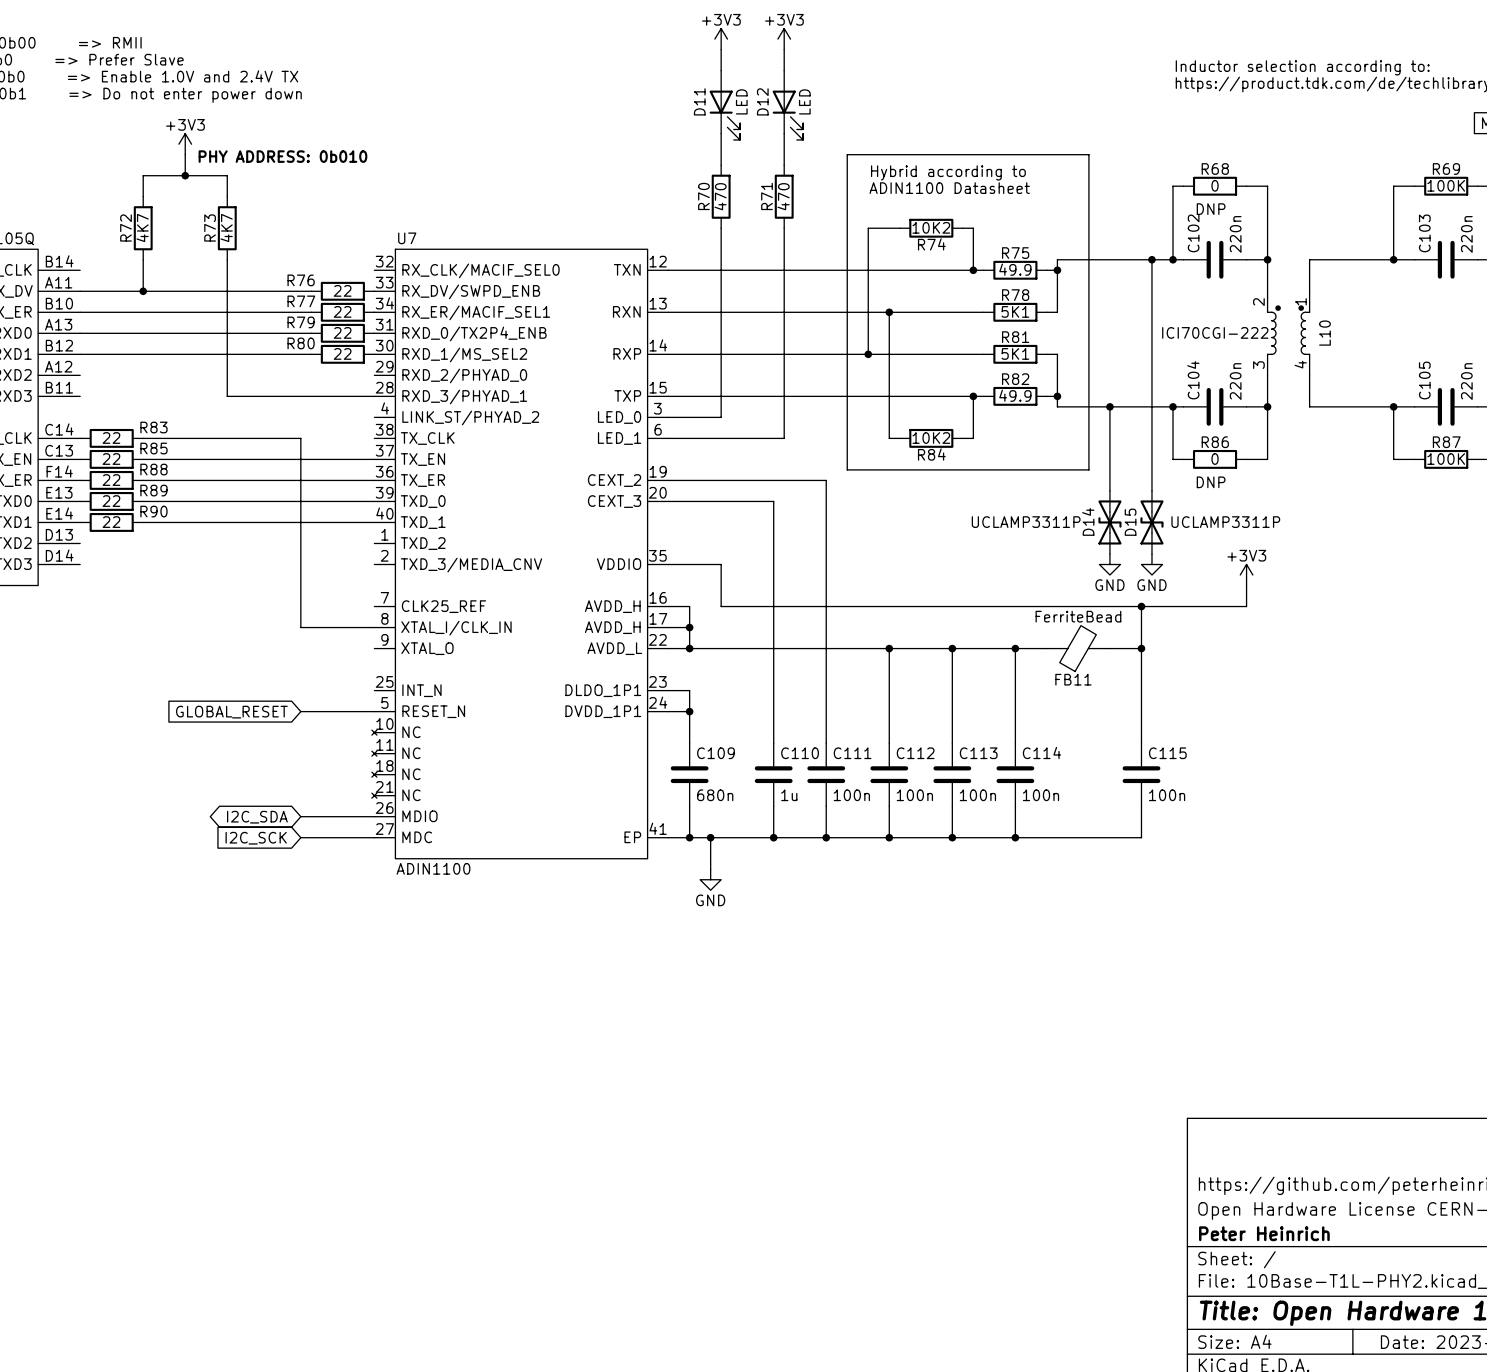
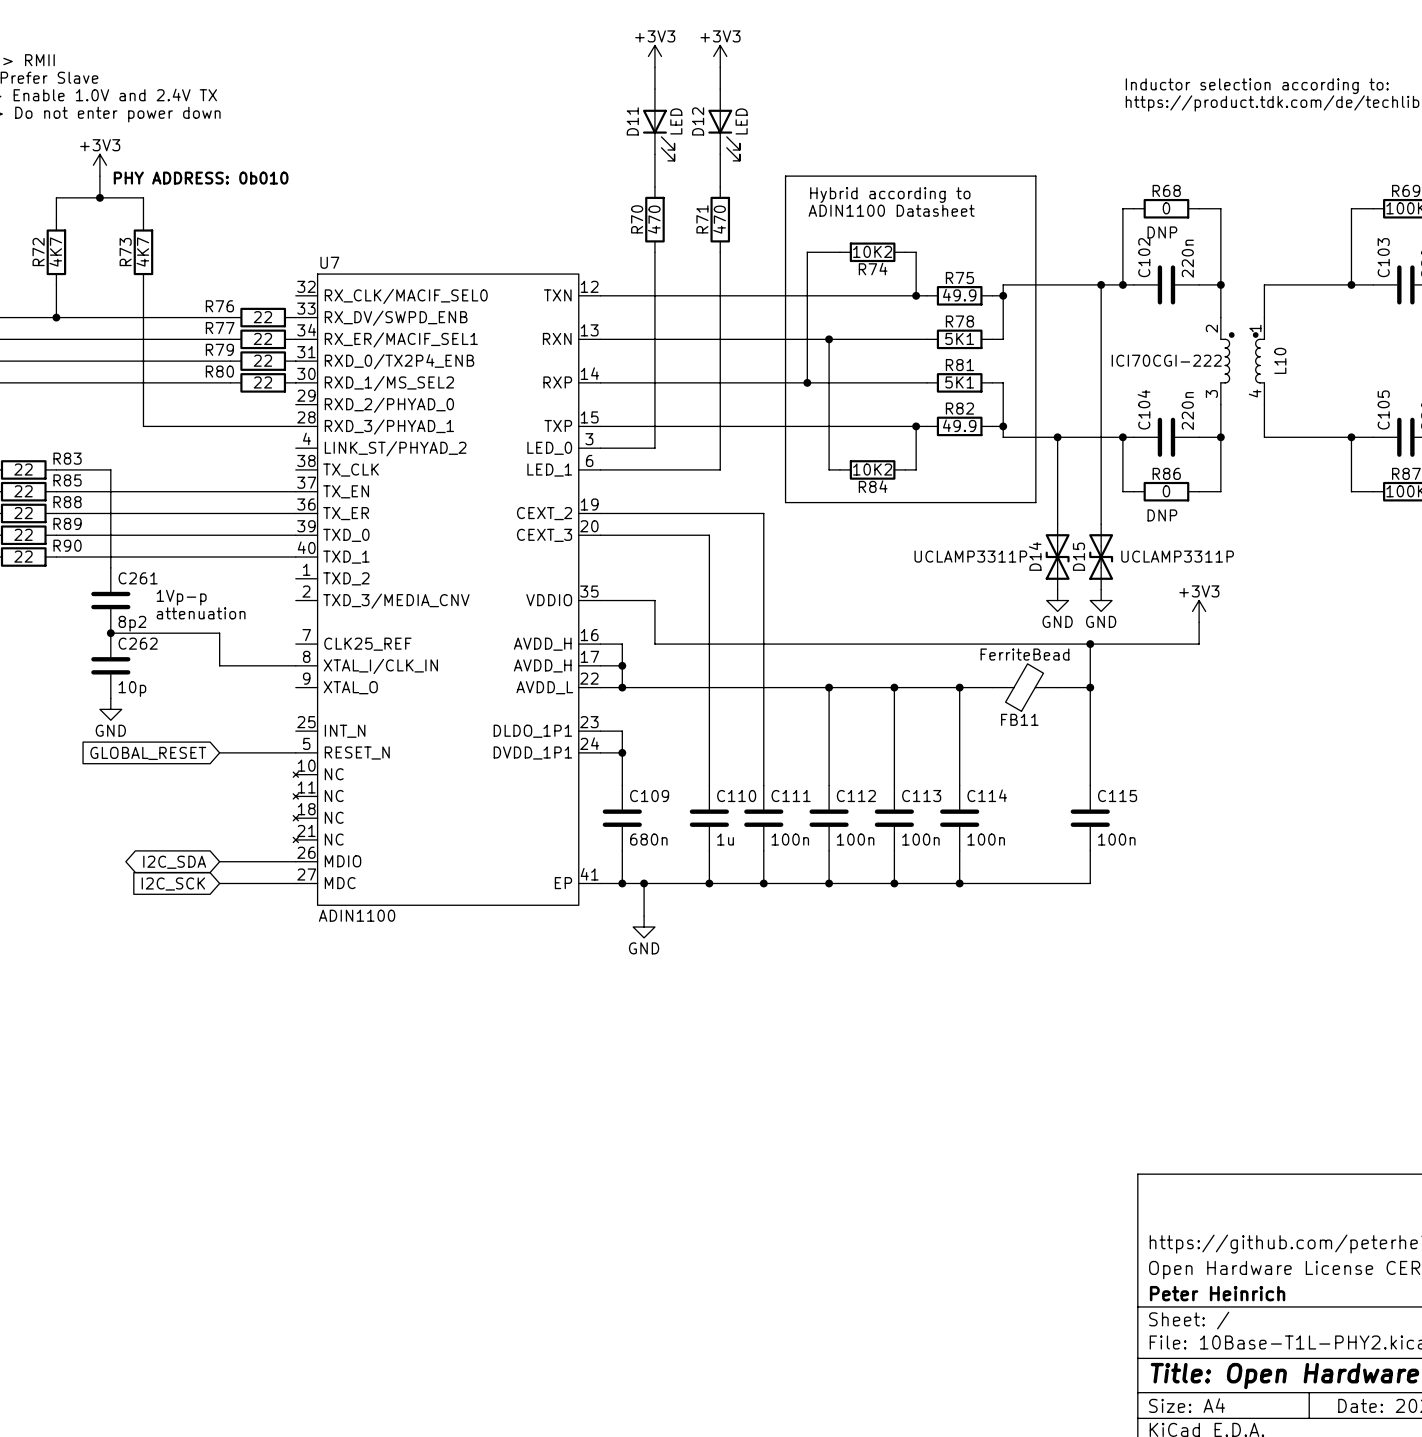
wire: (195, 438) (300, 438) (300, 596) -> (110, 469) (110, 567)
text: none -> 1Vp-p (181, 597)
C261: none -> 8p2 (110, 600)
text: none -> attenuation (201, 613)
wire: none -> (110, 633) (219, 633)
junction: none -> (110, 633)
C262: none -> 10p (110, 665)
power symbol: none -> GND (110, 709)

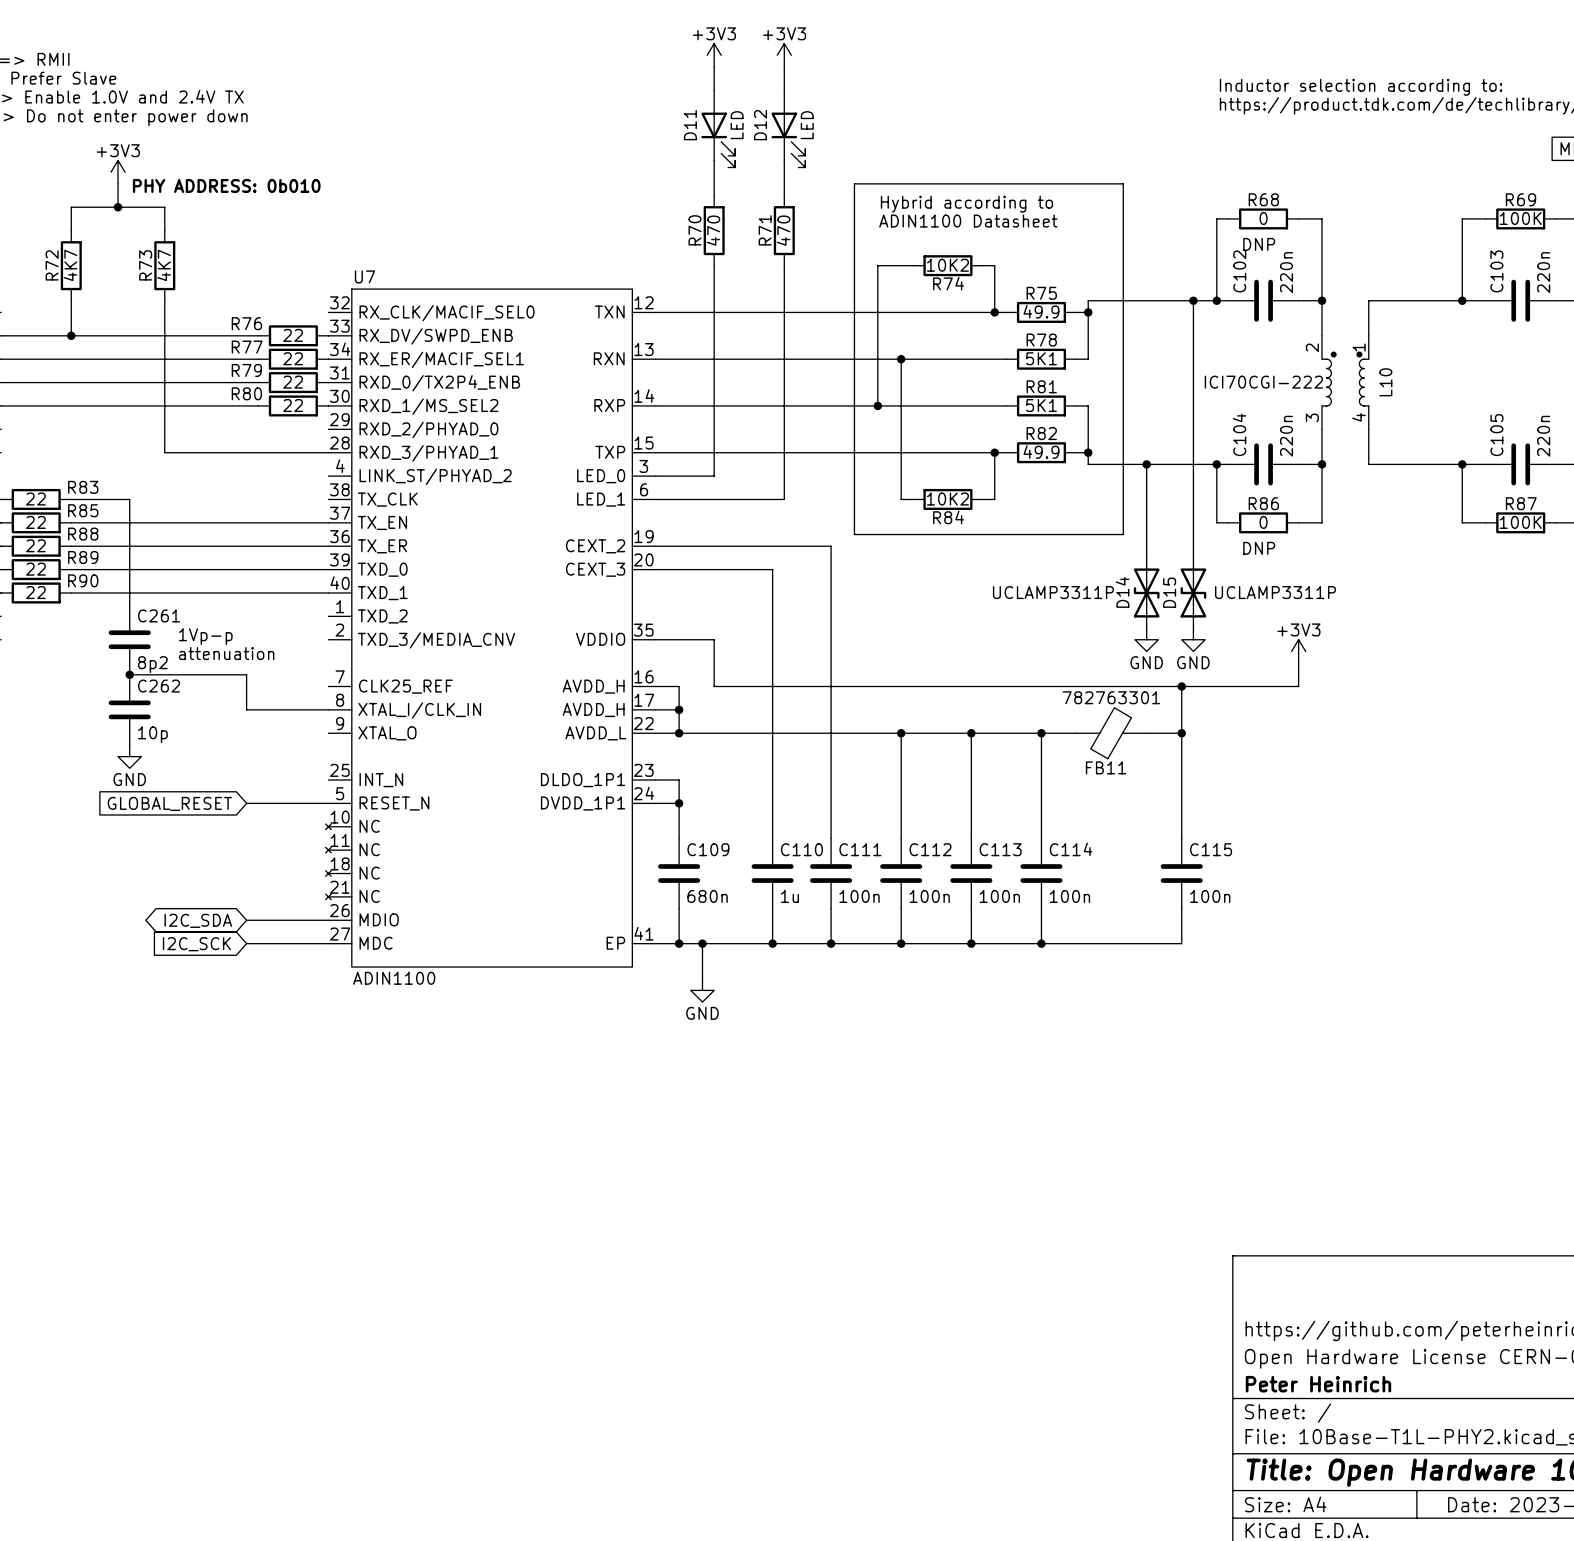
FB11 value: FerriteBead (1024, 654) -> 782763301 (1111, 697)

